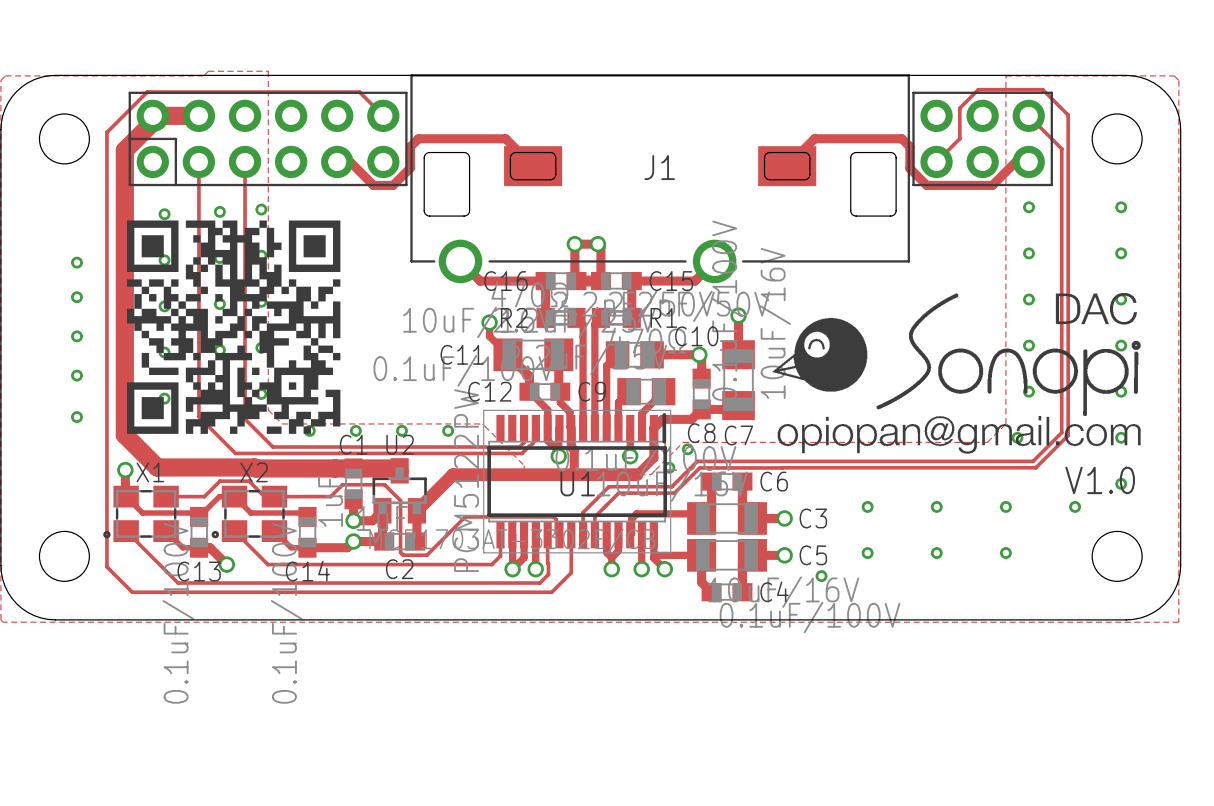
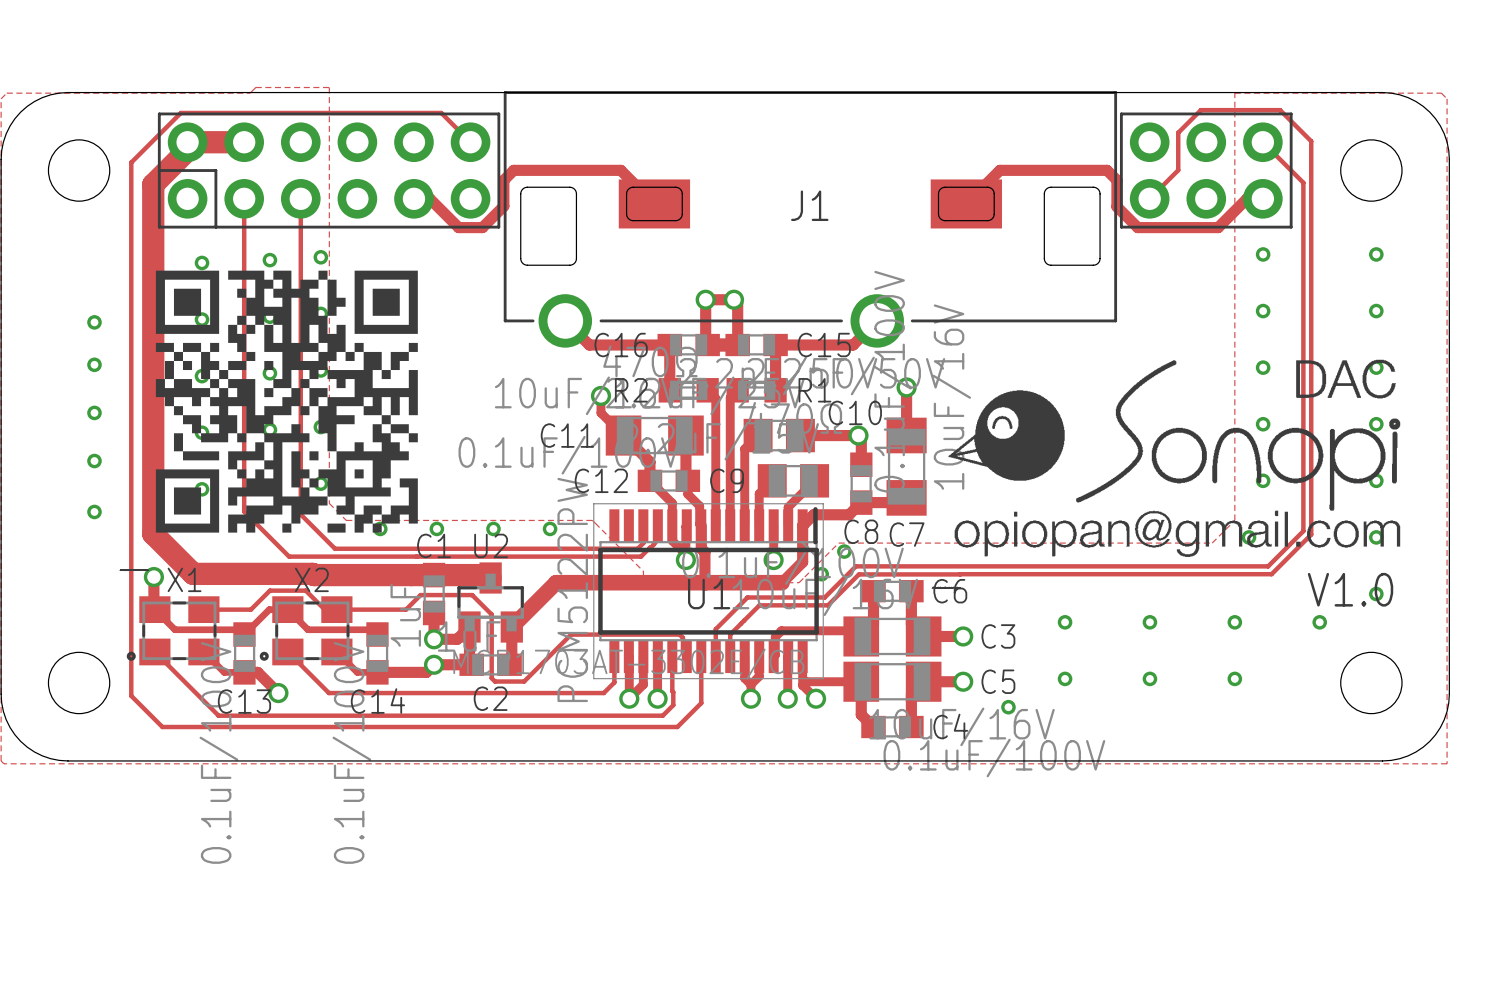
drawing shape: [127, 220, 341, 434] -> [120, 270, 418, 571]
drawing shape: [772, 293, 1141, 454] -> [932, 359, 1401, 589]

